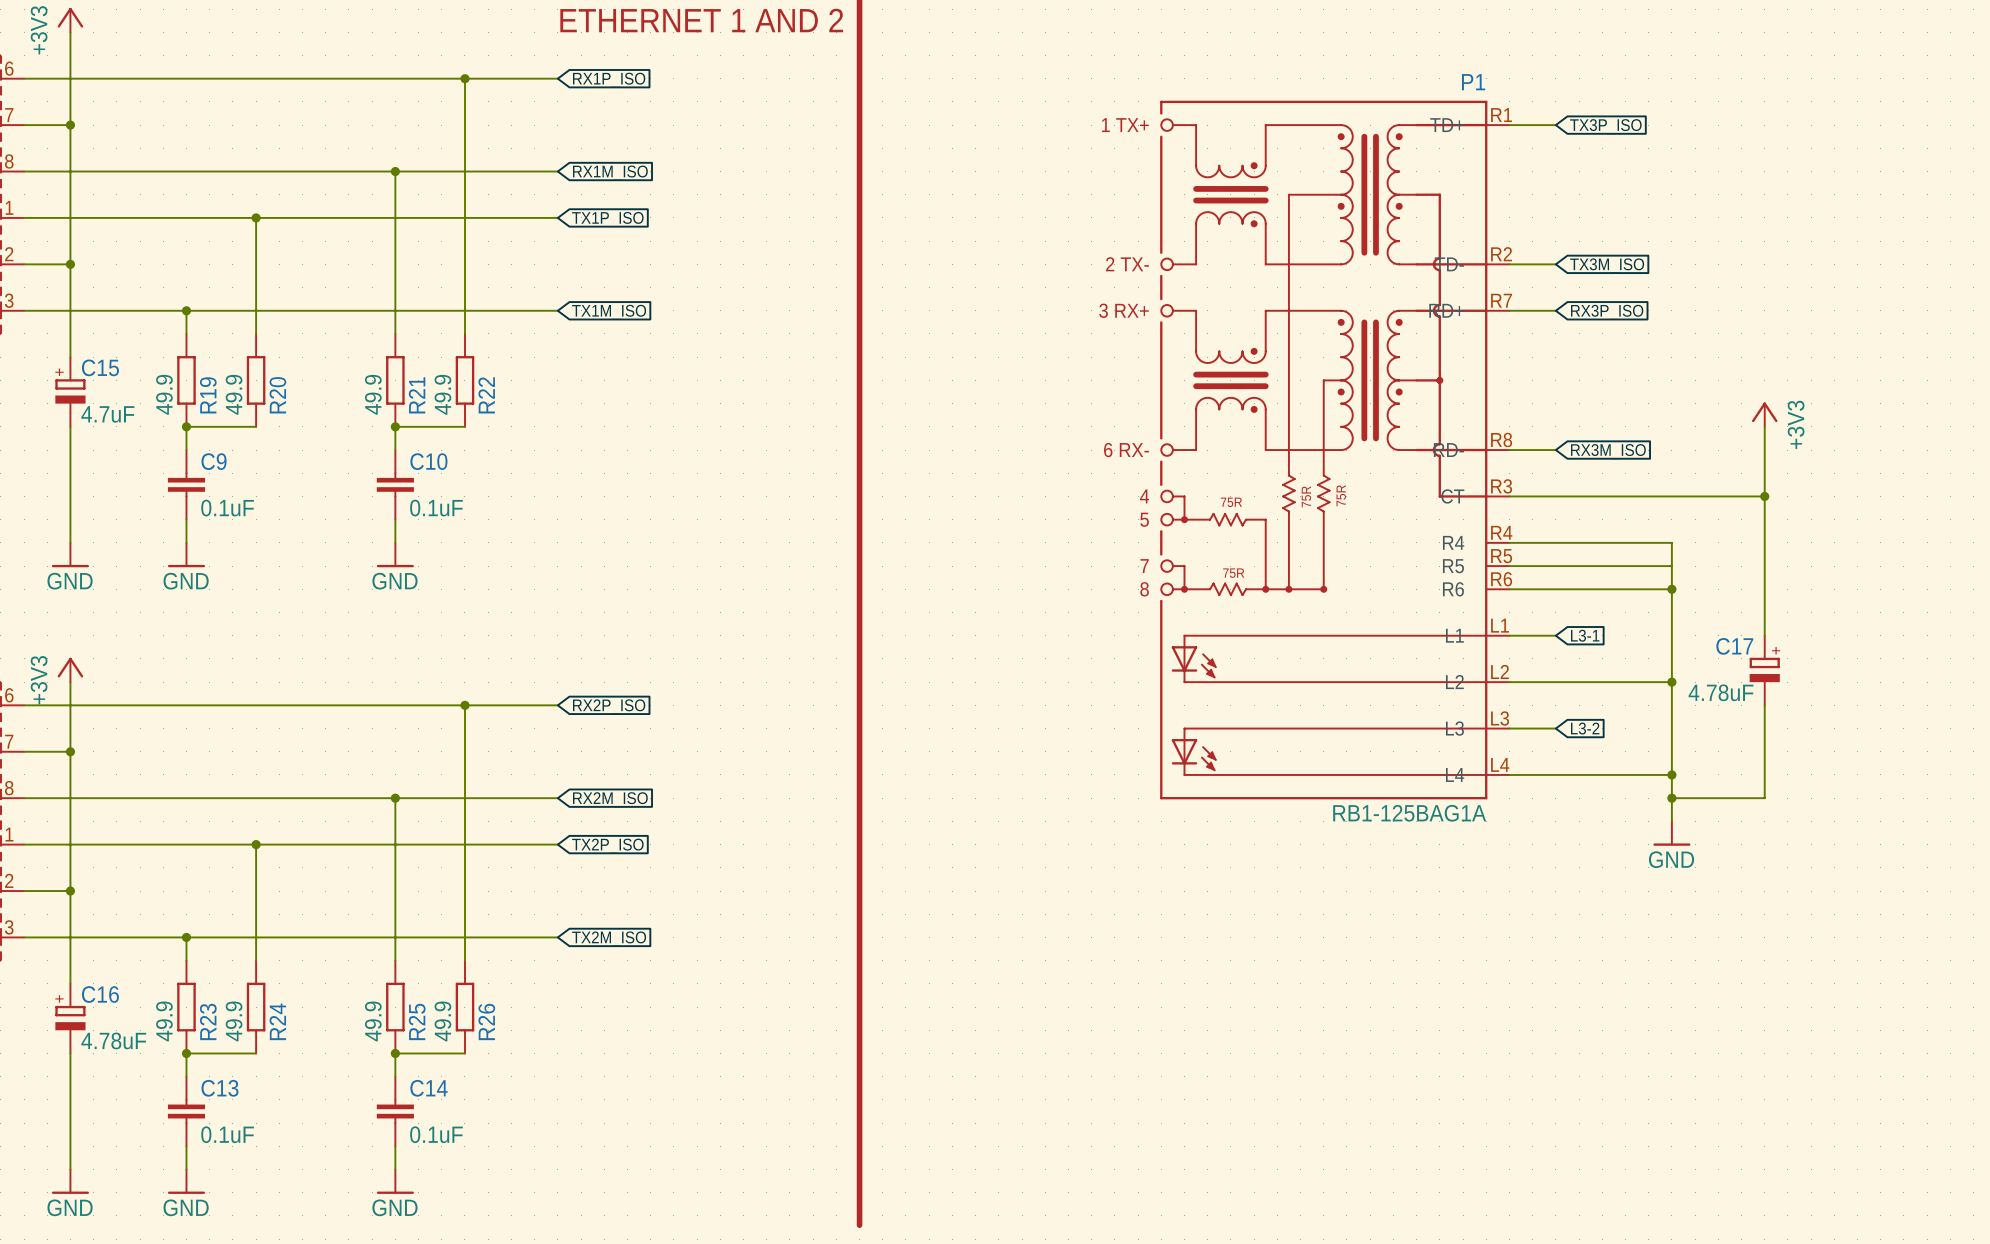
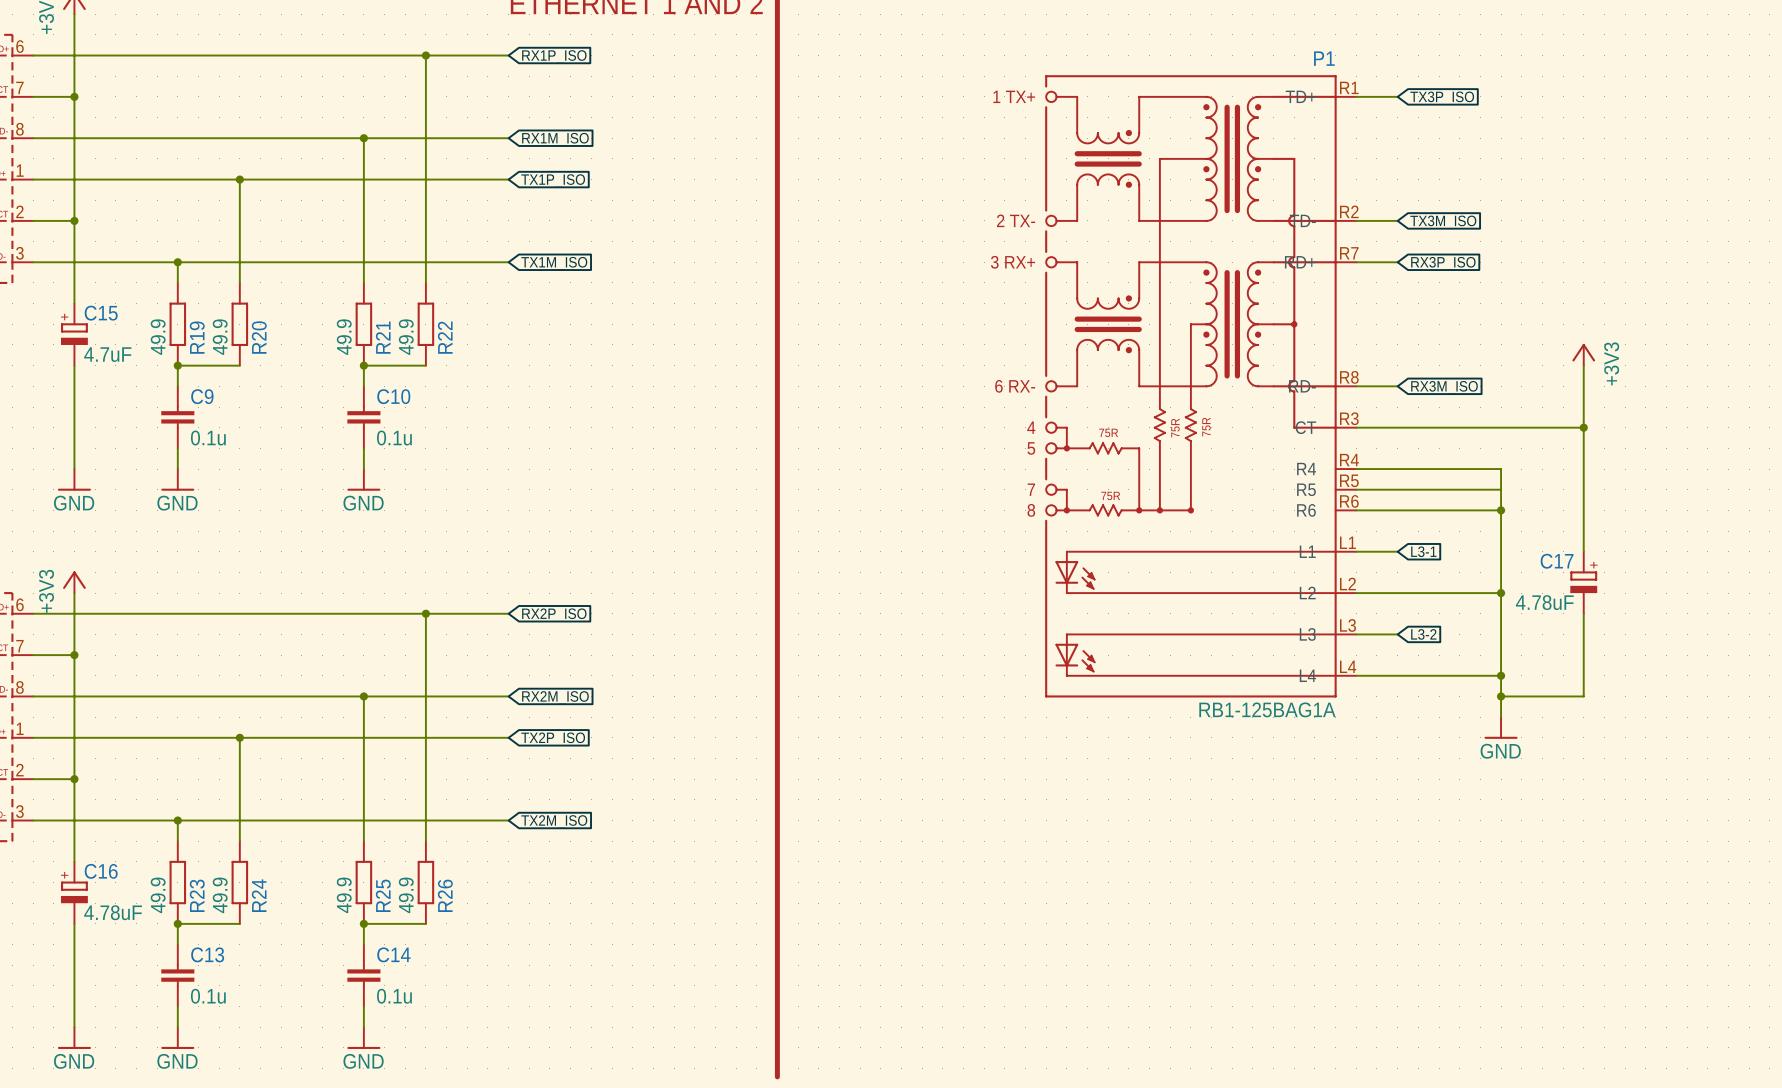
C9 value: 0.1uF (227, 508) -> 0.1u (208, 438)
C10 value: 0.1uF (436, 508) -> 0.1u (394, 438)
C13 value: 0.1uF (227, 1134) -> 0.1u (208, 996)
C14 value: 0.1uF (436, 1134) -> 0.1u (394, 996)

